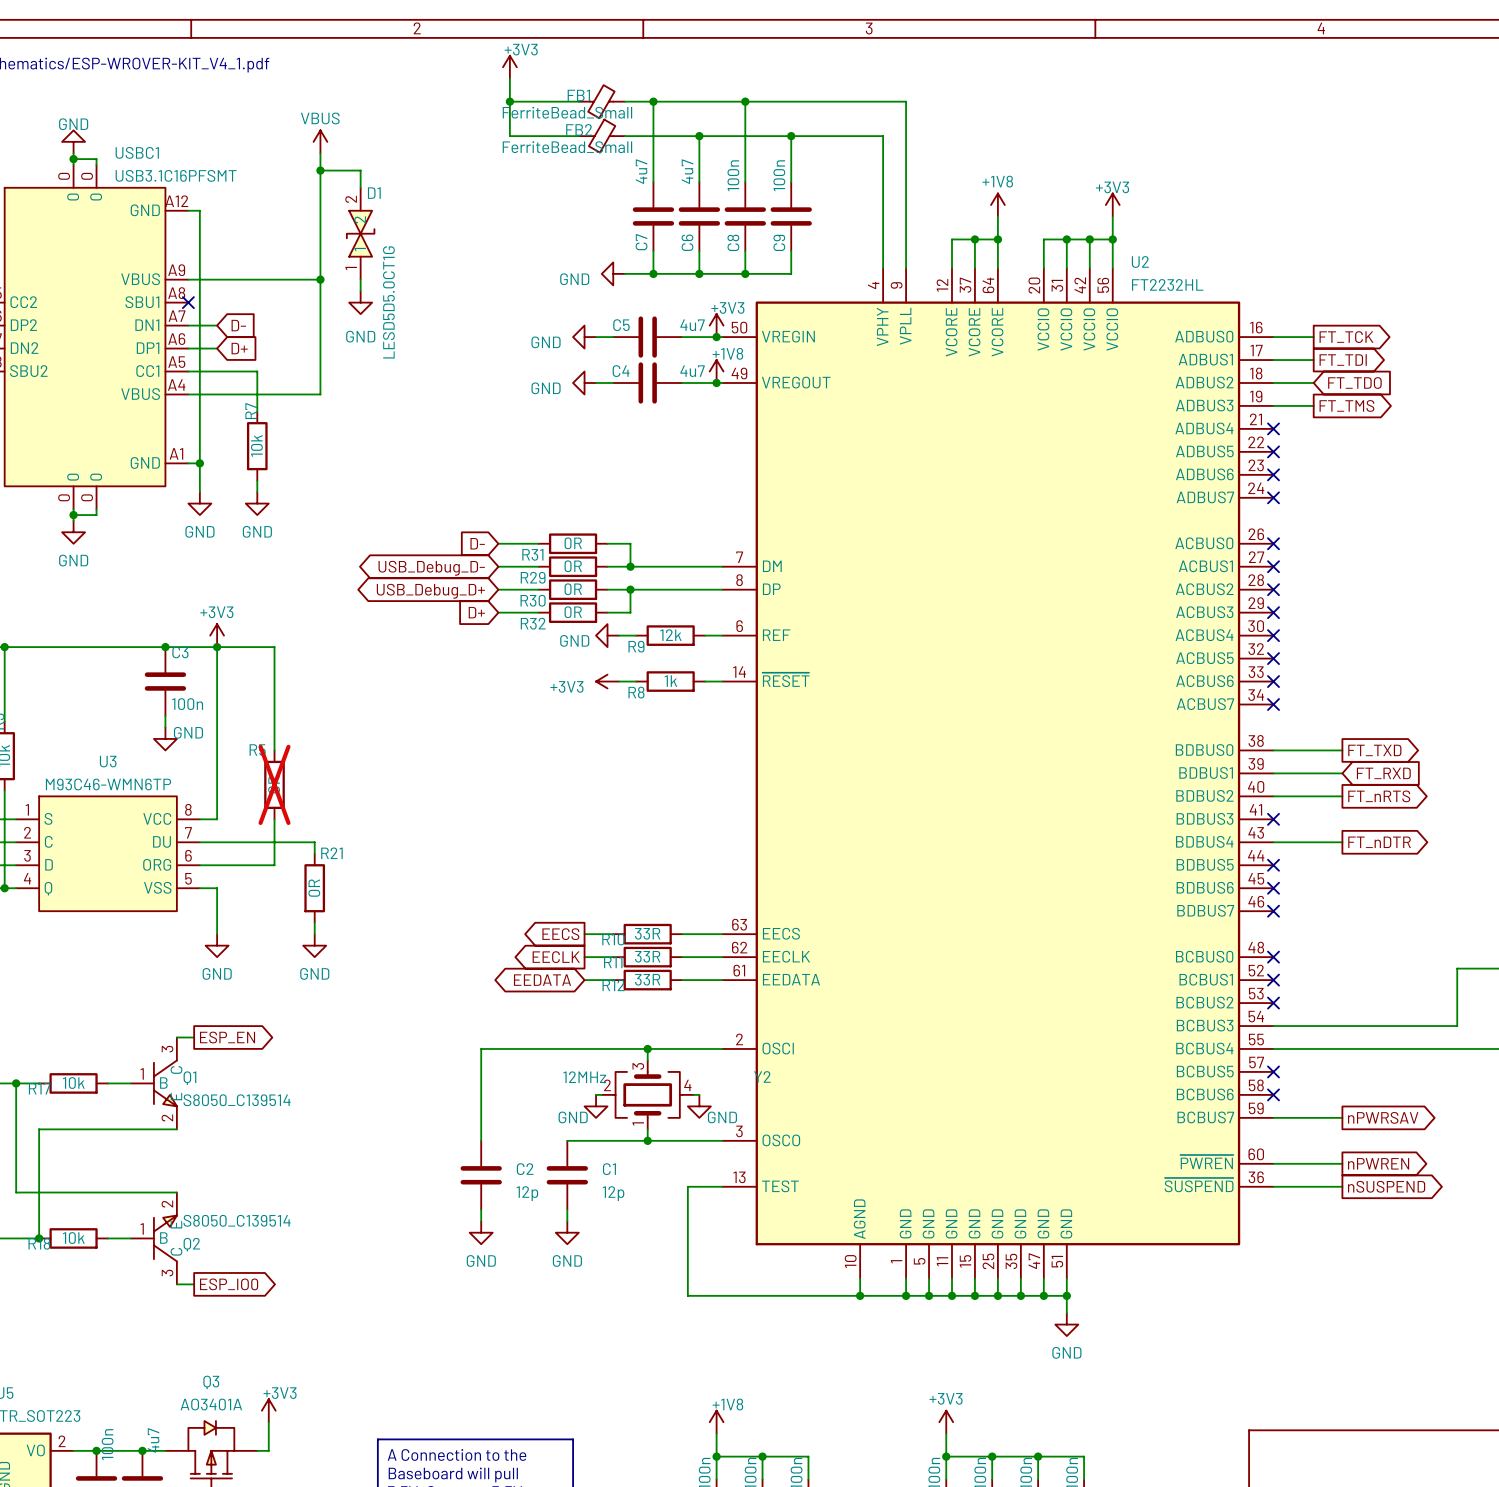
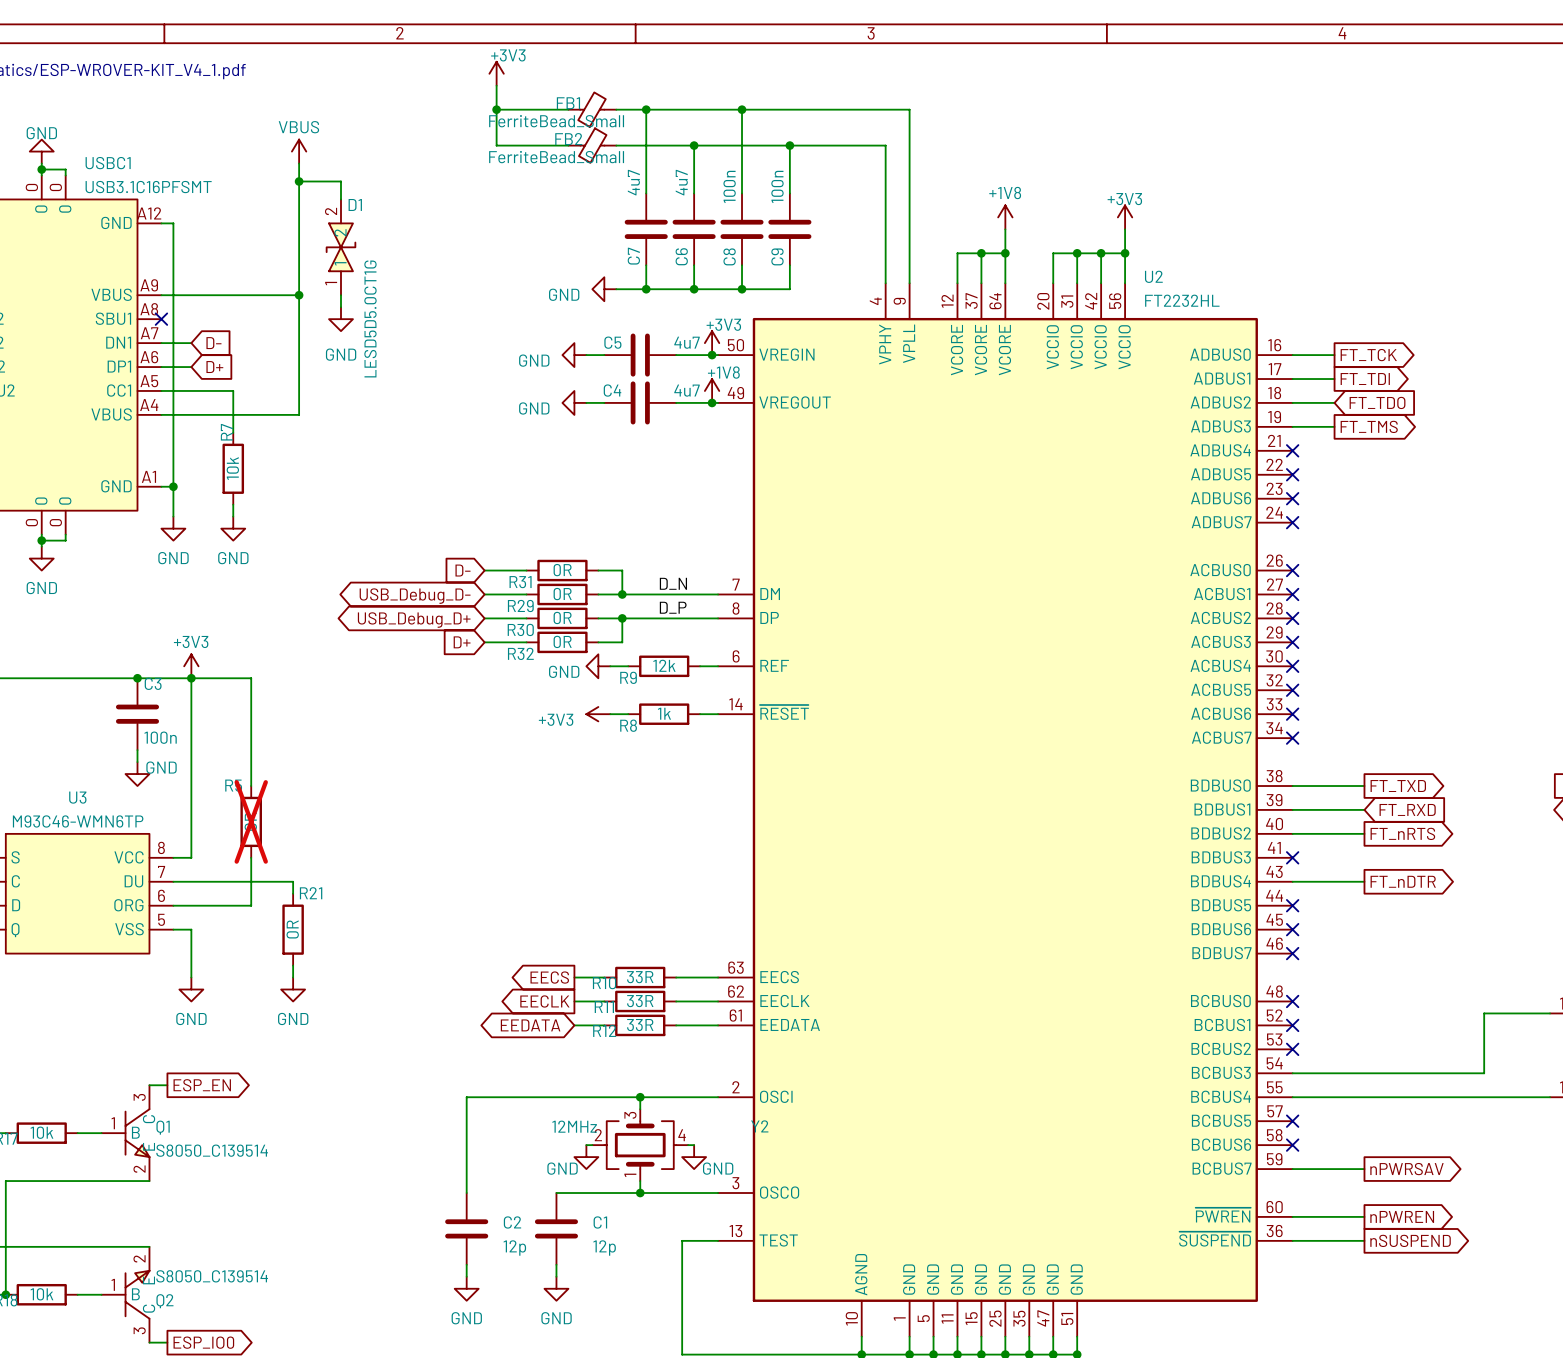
label: none -> D_N (673, 583)
label: none -> D_P (673, 607)

